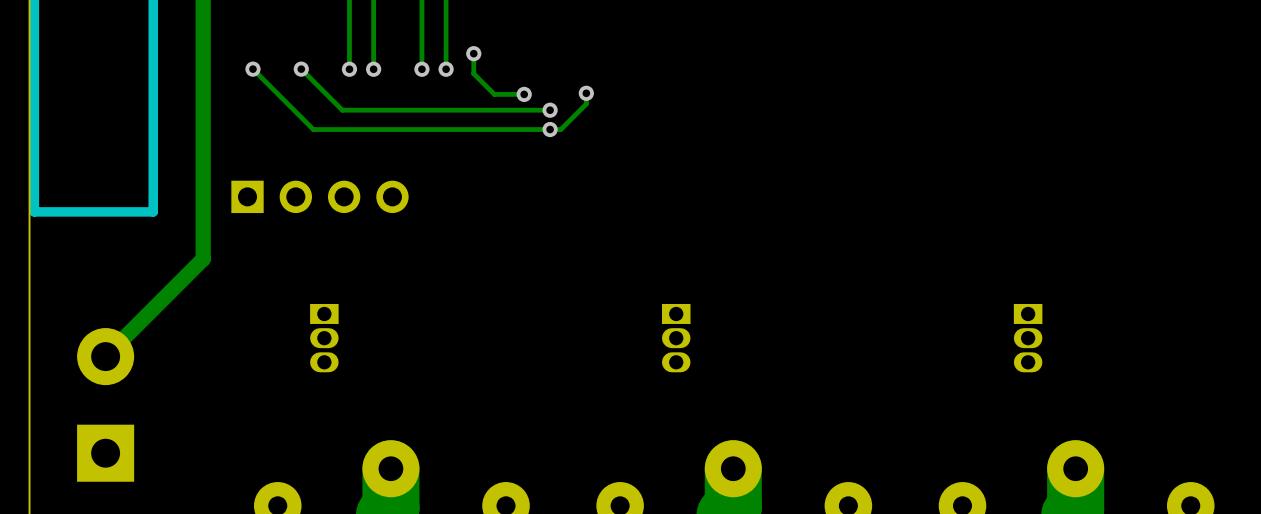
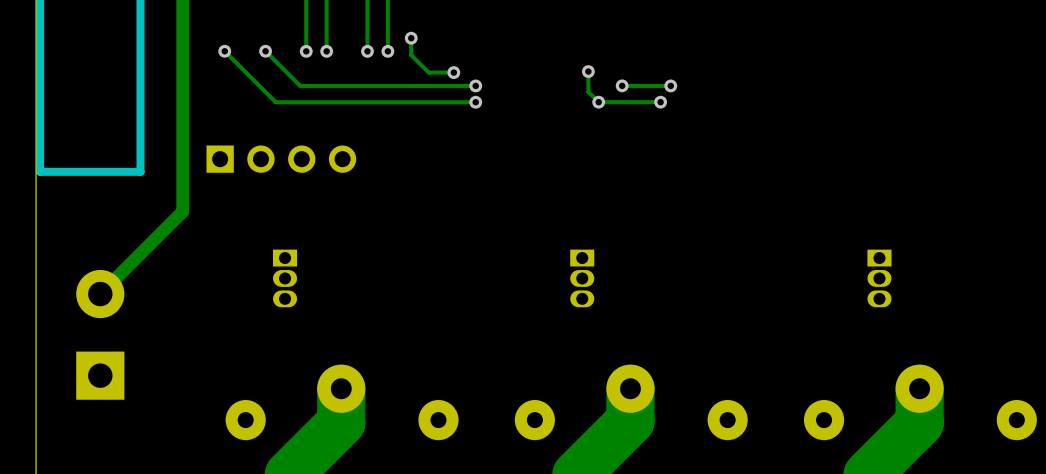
track: (586, 93) (586, 104) (560, 129) (550, 129) -> none
via: (586, 93) -> none
track: none -> (588, 71) (588, 91) (598, 102) (660, 102)
via: none -> (588, 71)
via: none -> (622, 85)
track: none -> (670, 85) (622, 85)
via: none -> (670, 85)
via: none -> (598, 102)
via: none -> (660, 102)

